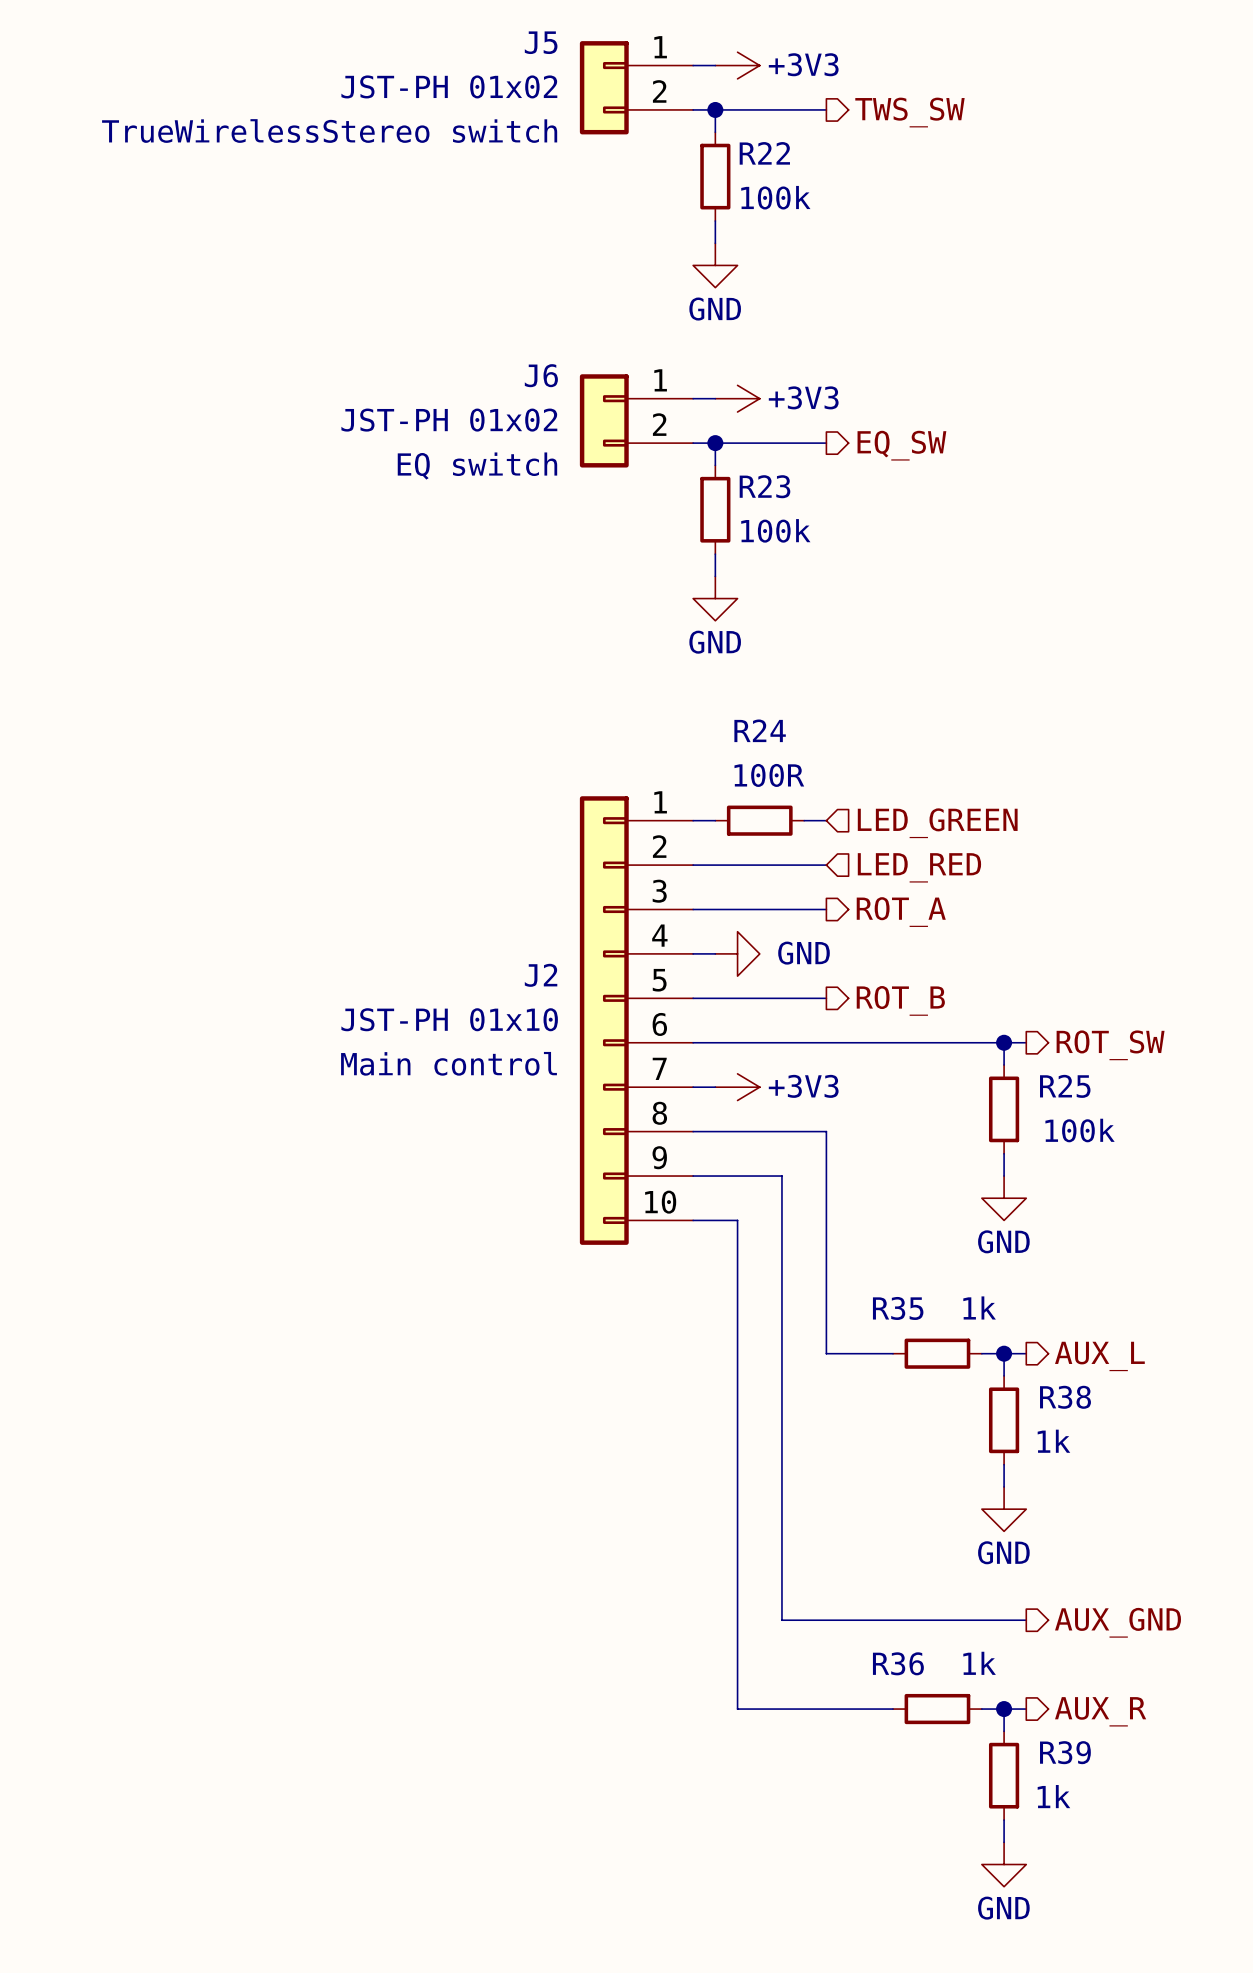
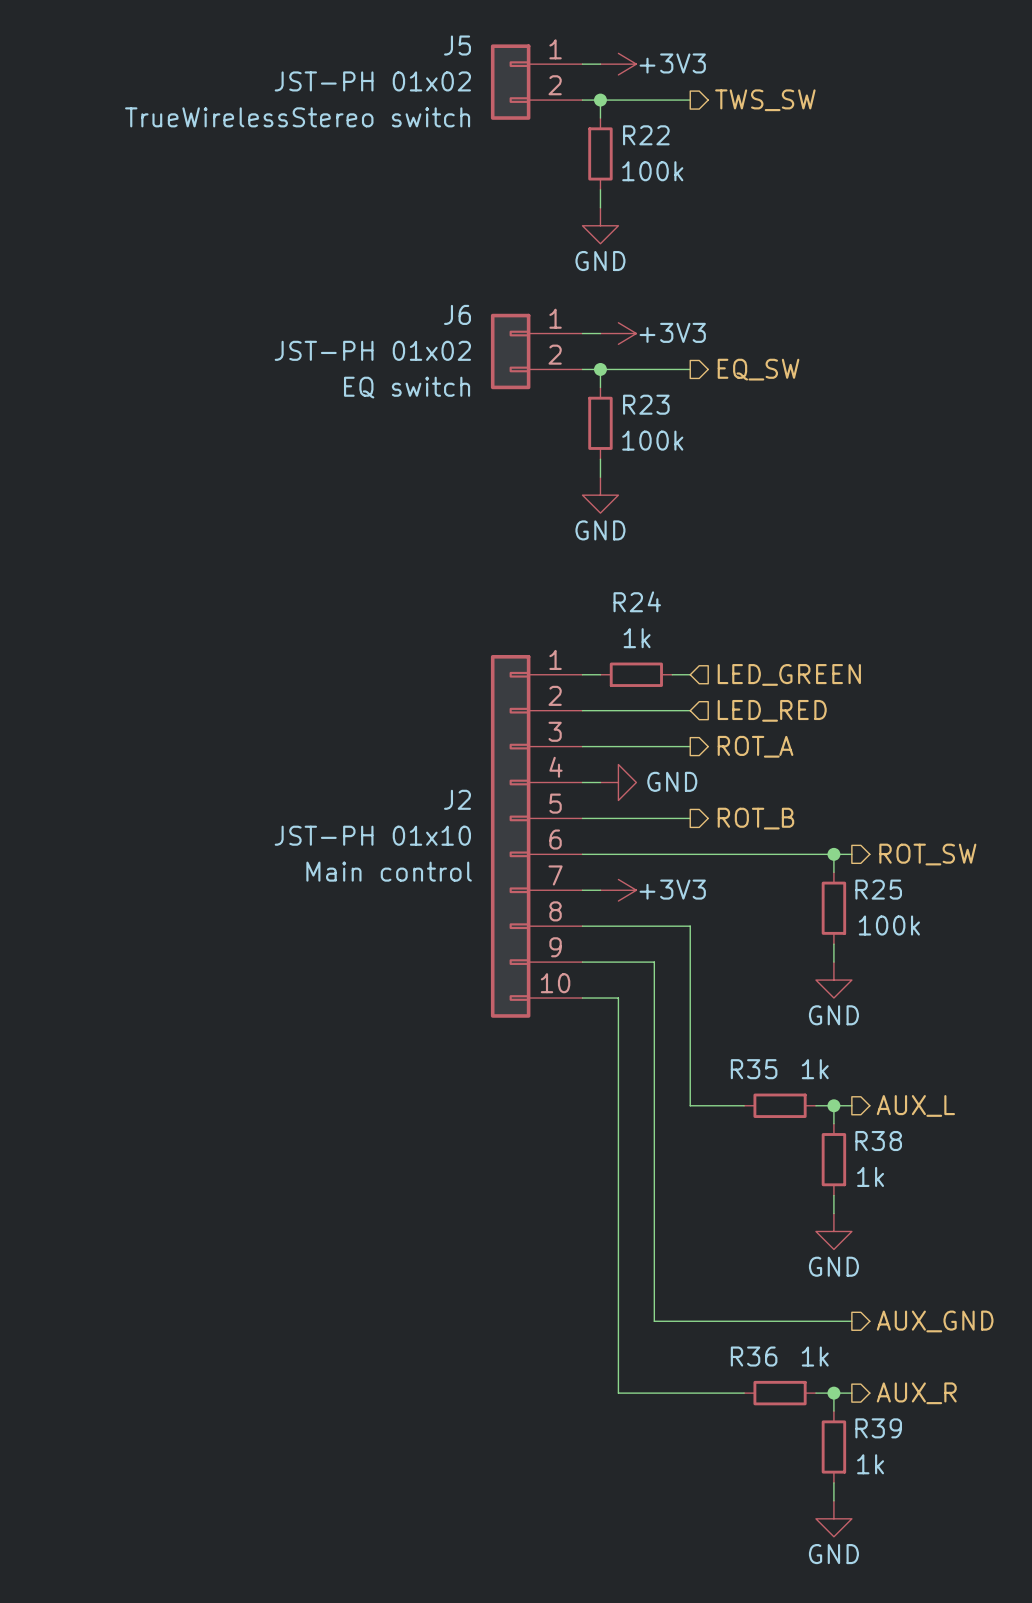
R24 value: 100R (769, 775) -> 1k (637, 638)

